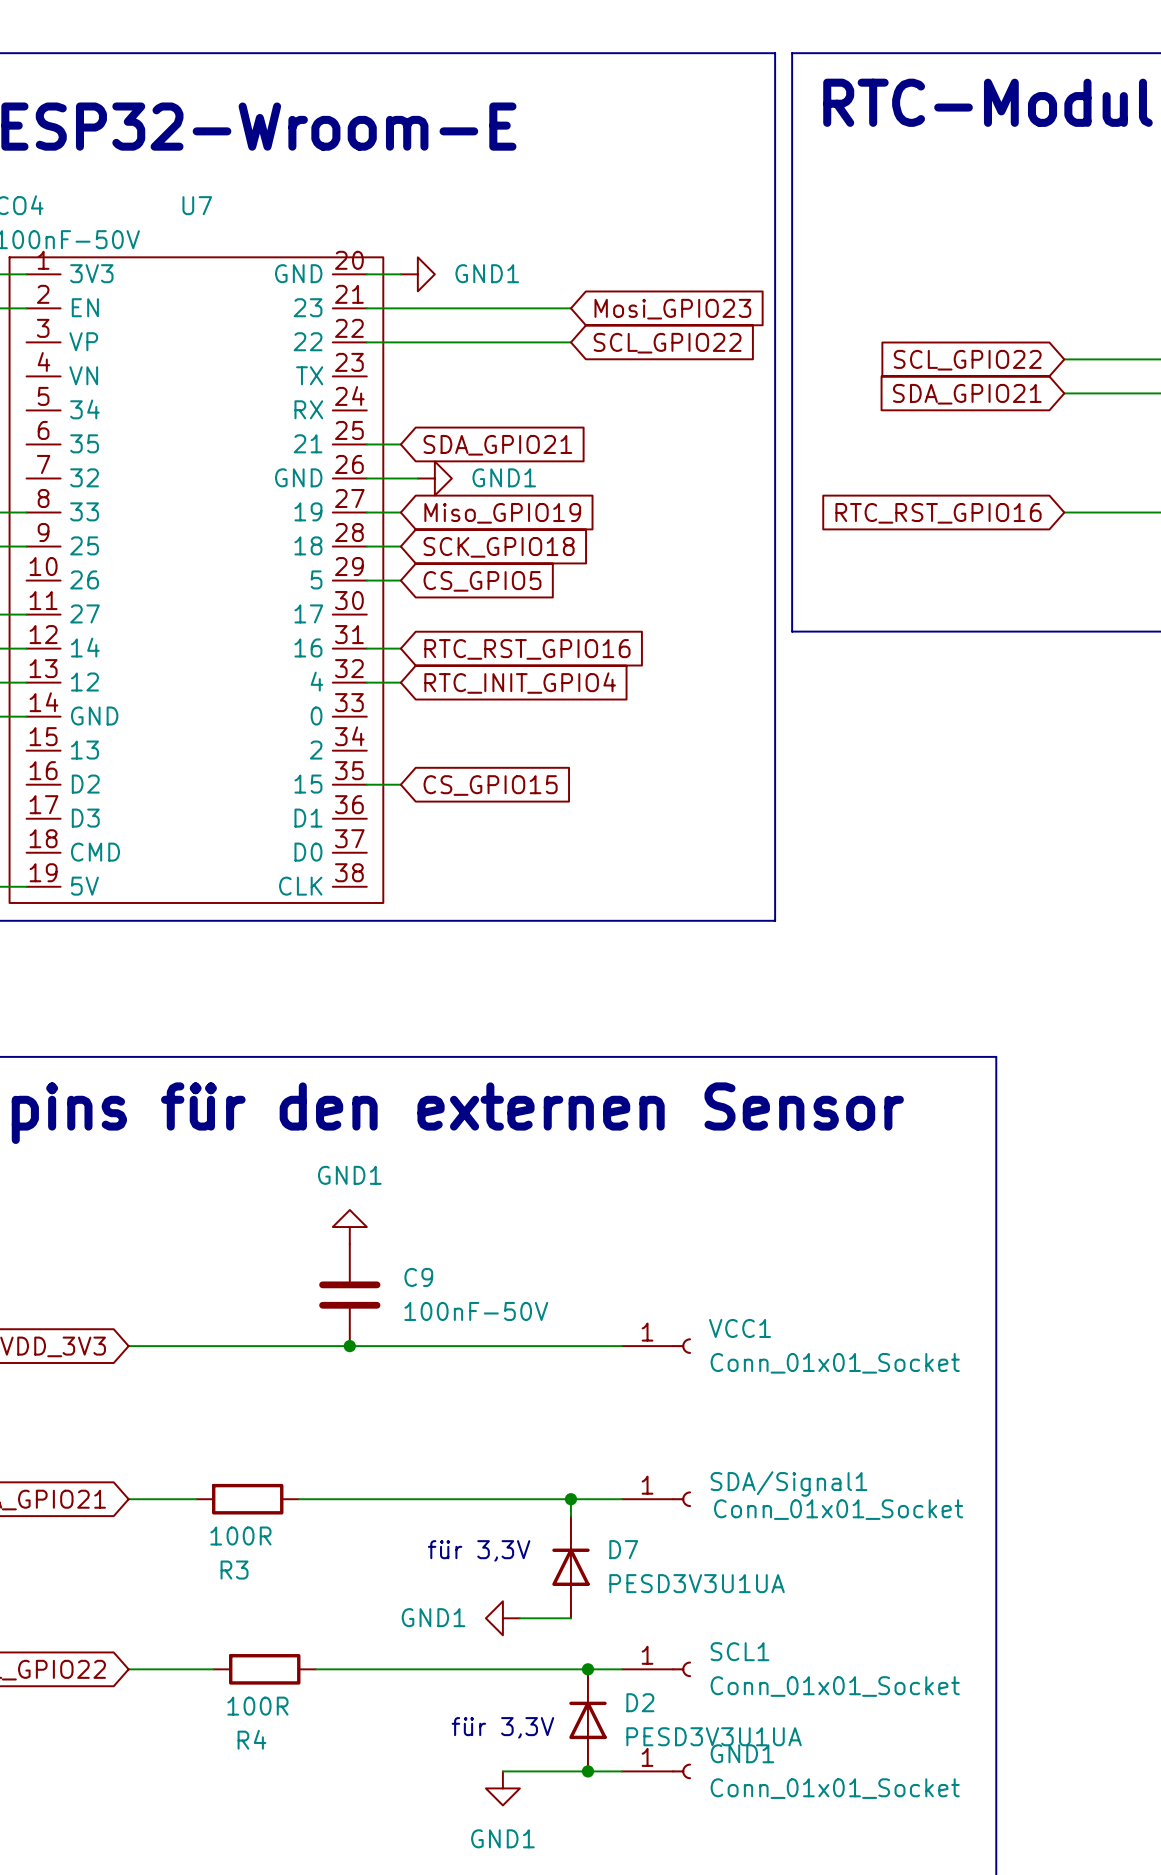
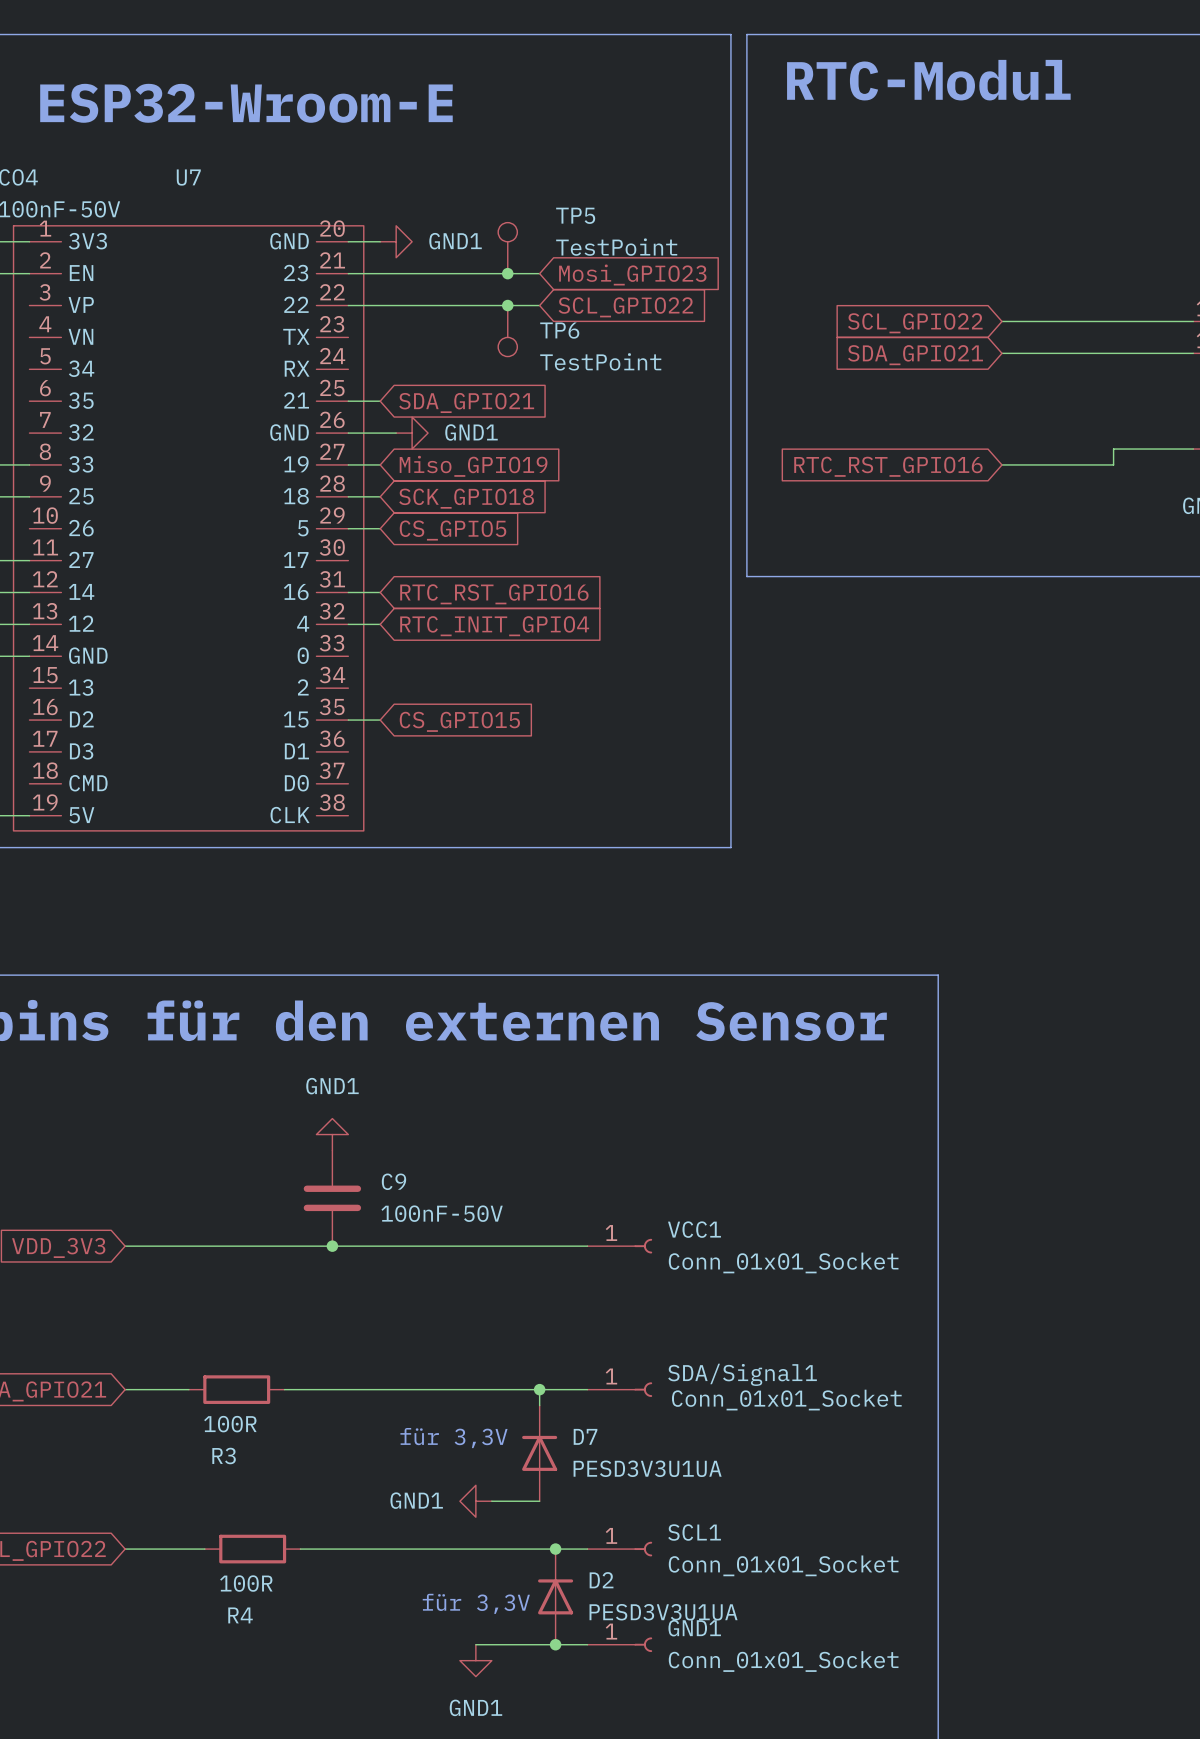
TP5: none -> TestPoint (507, 248)
junction: none -> (507, 273)
junction: none -> (507, 305)
TP6: none -> TestPoint (507, 331)

